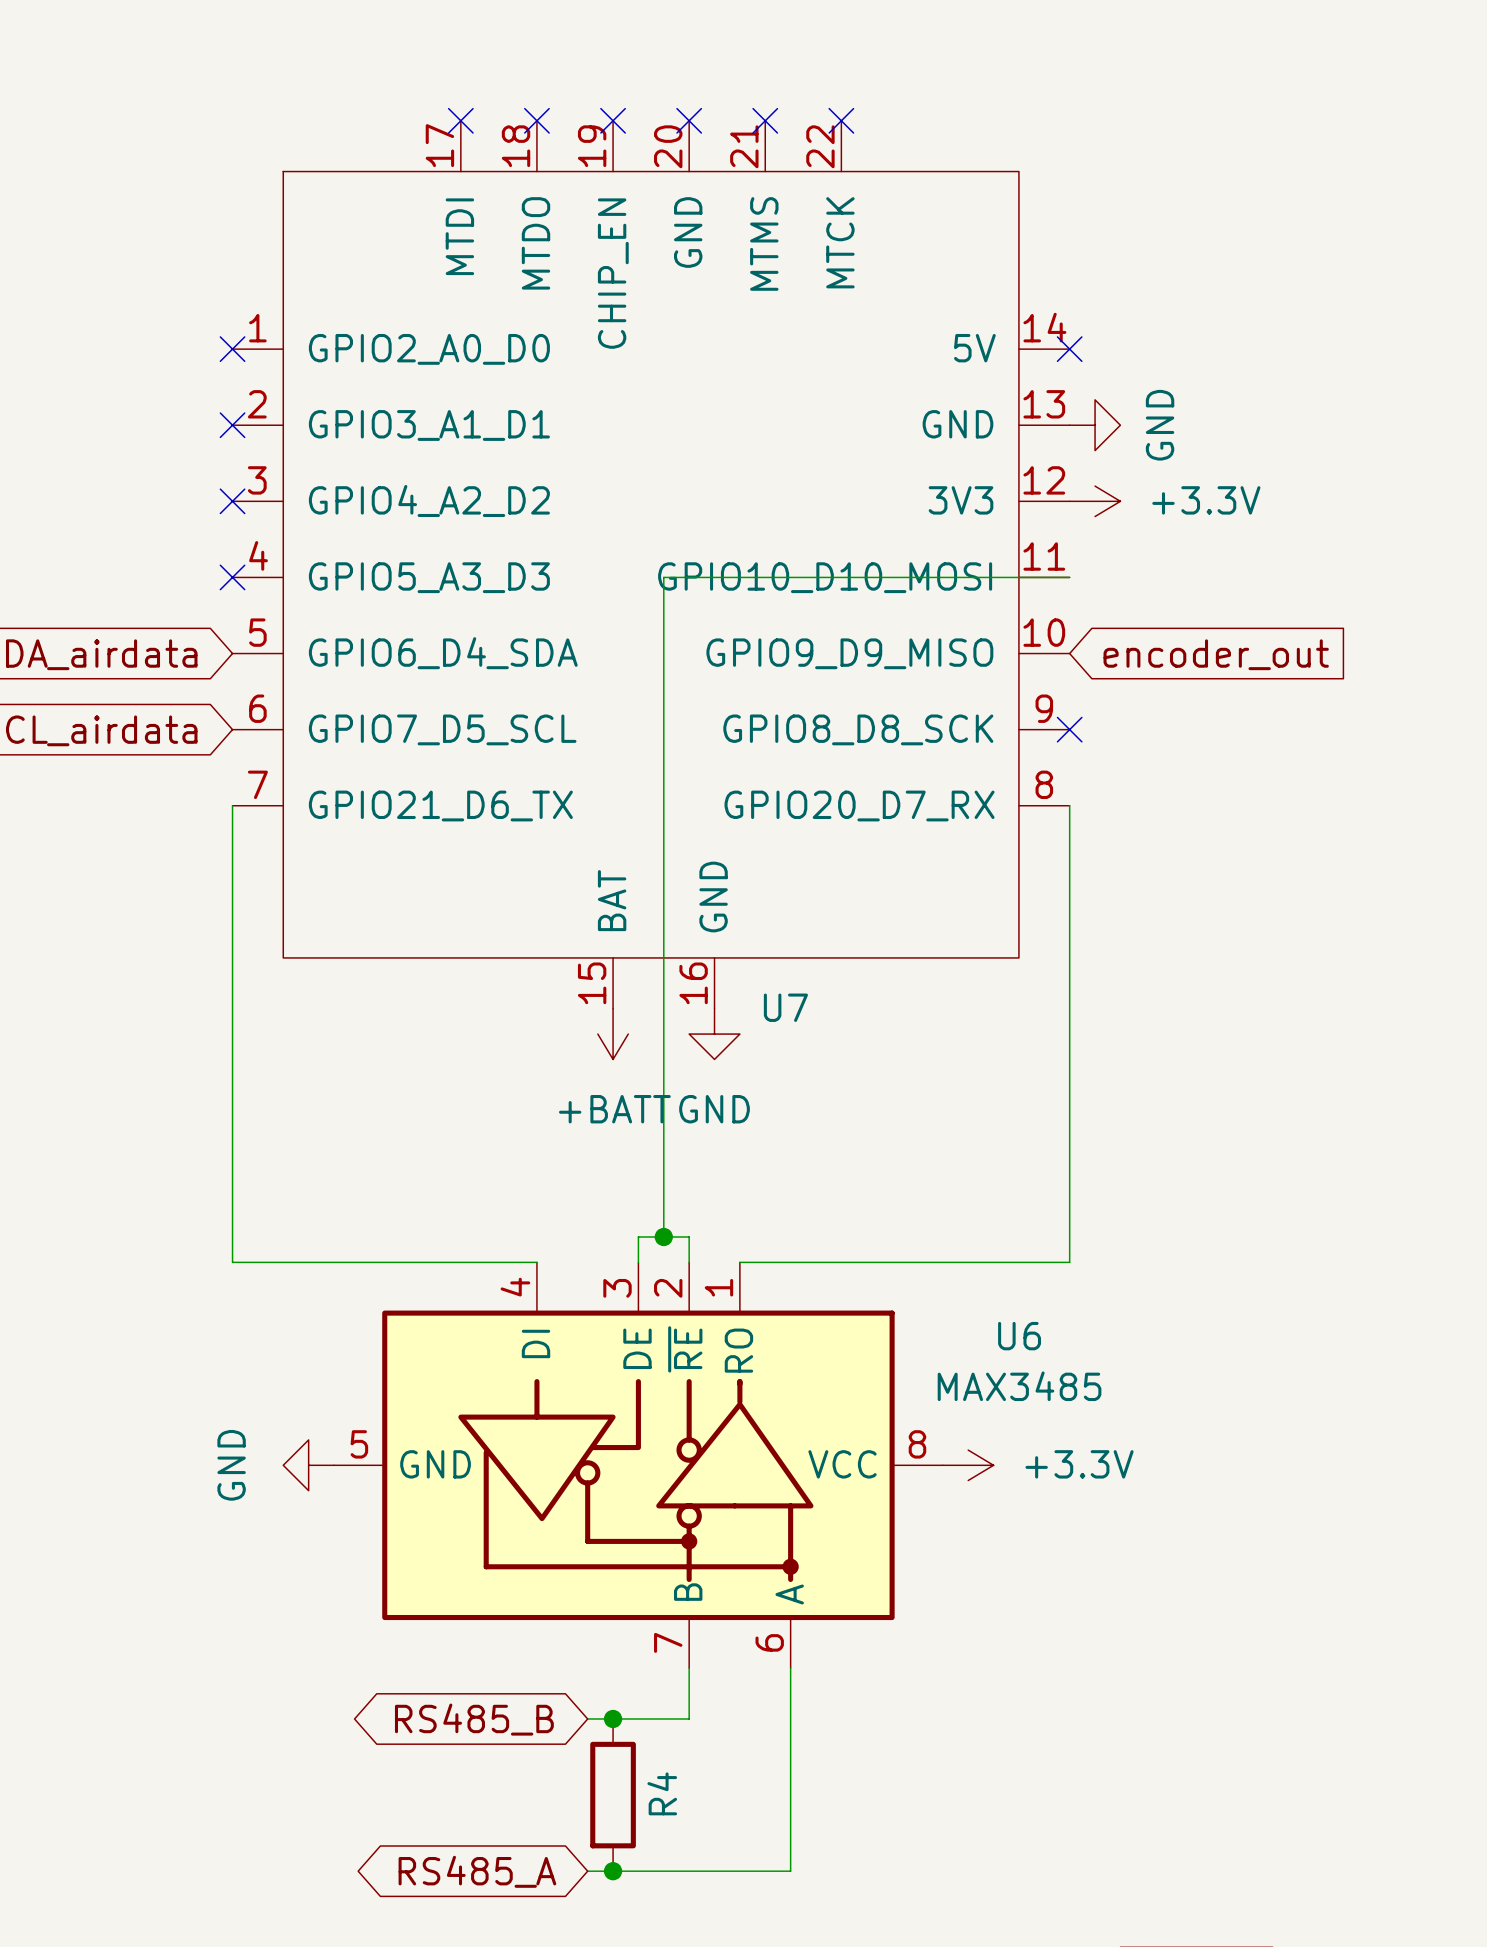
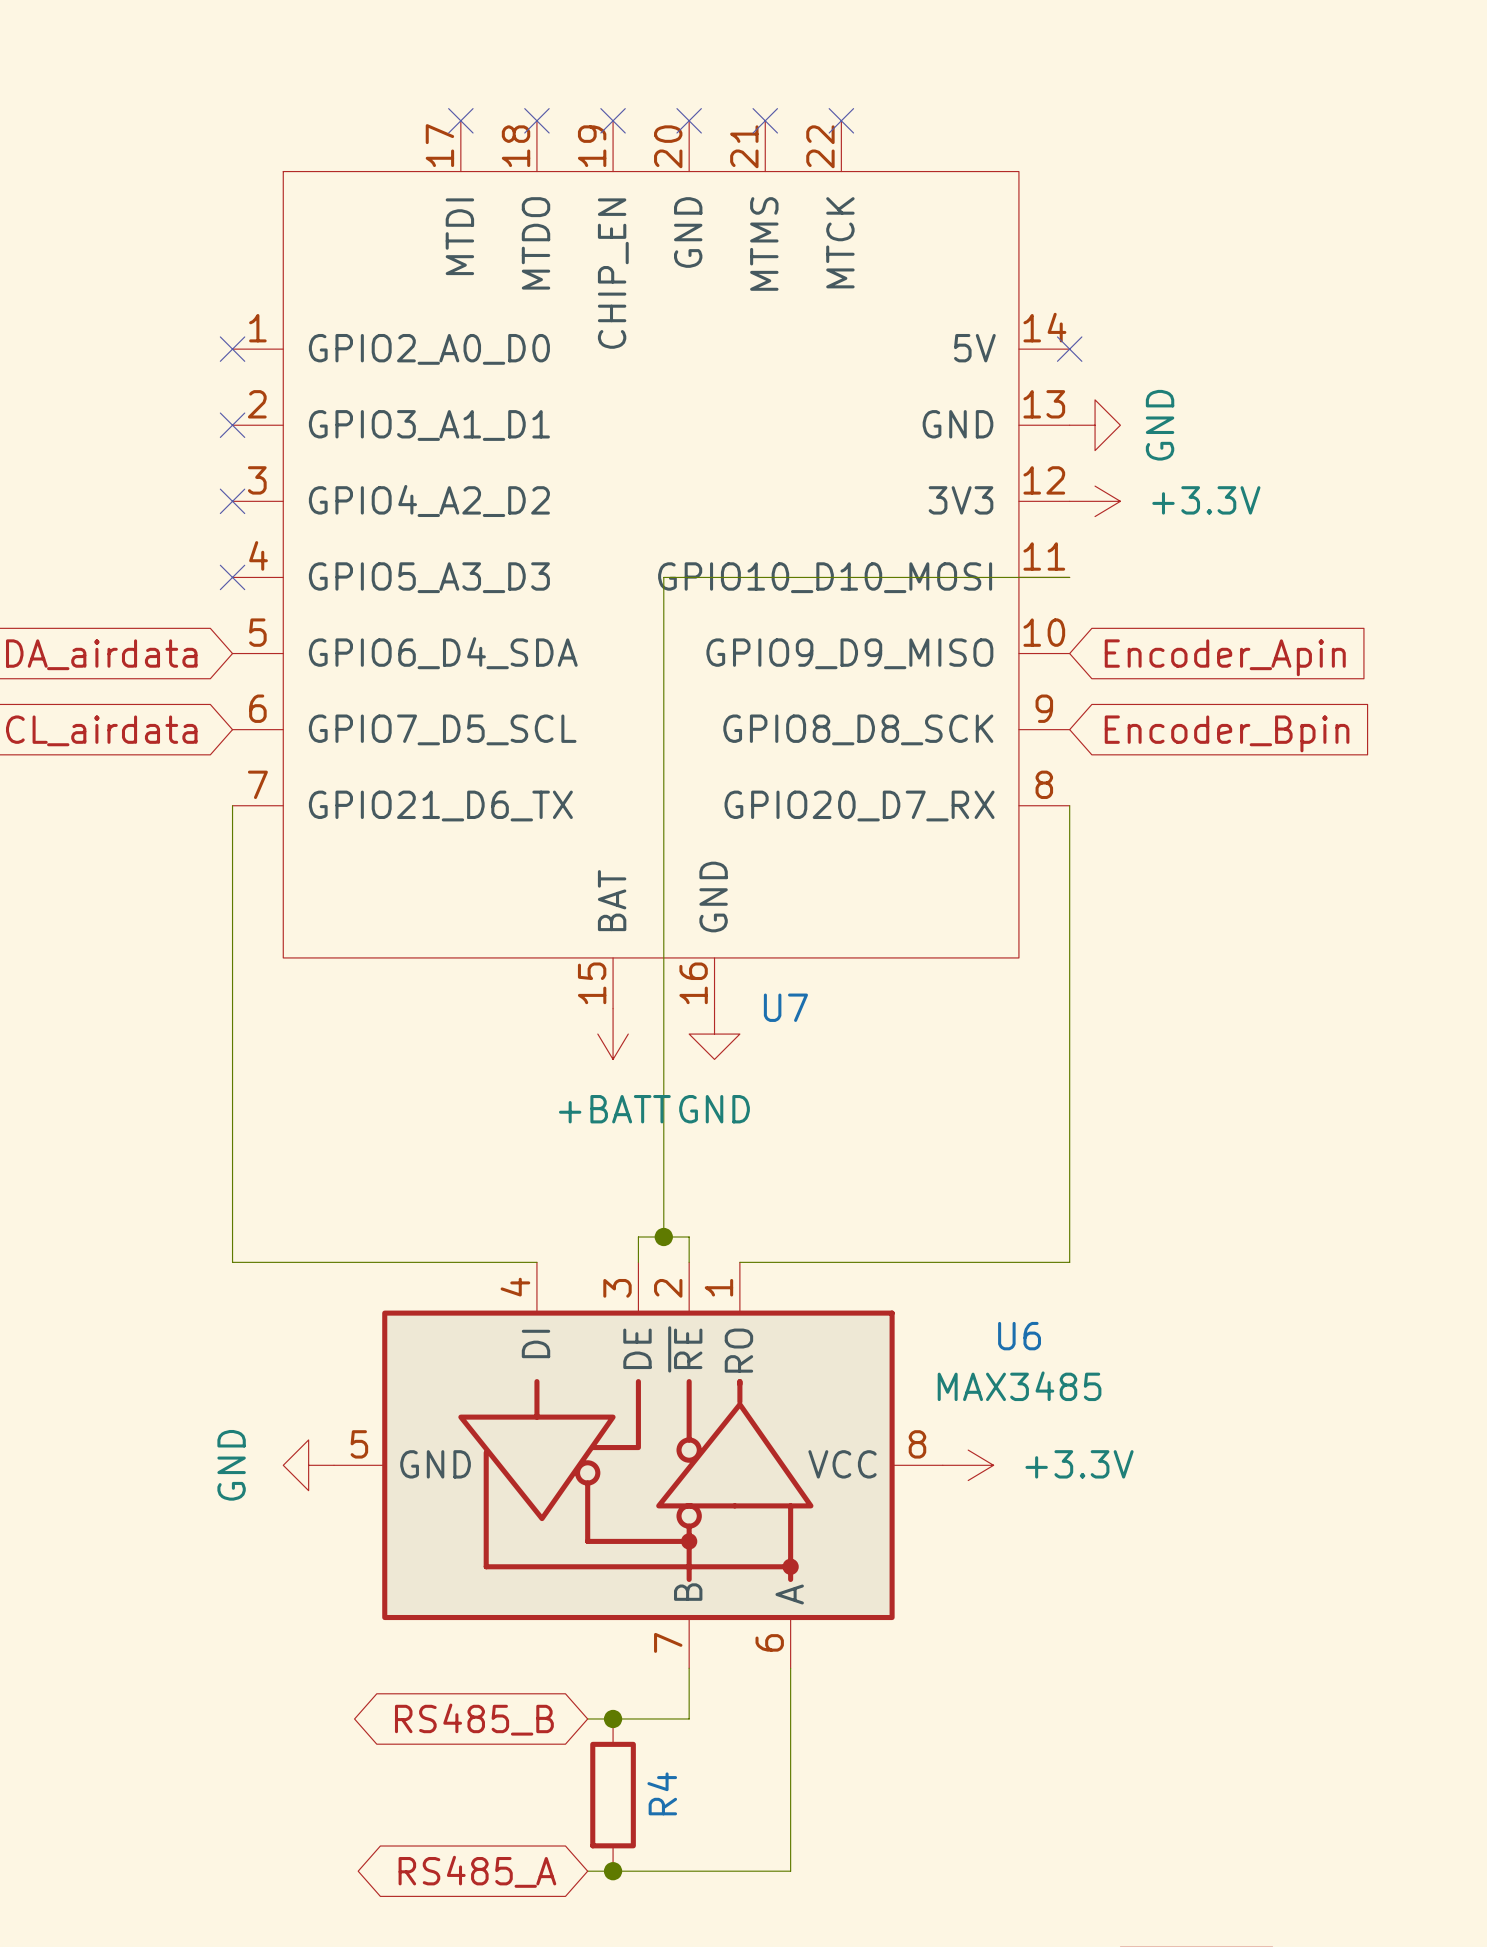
global label: encoder_out (1216, 654) -> Encoder_Apin (1225, 657)
no-connect mark: (1069, 729) -> none
global label: none -> Encoder_Bpin (1227, 733)

